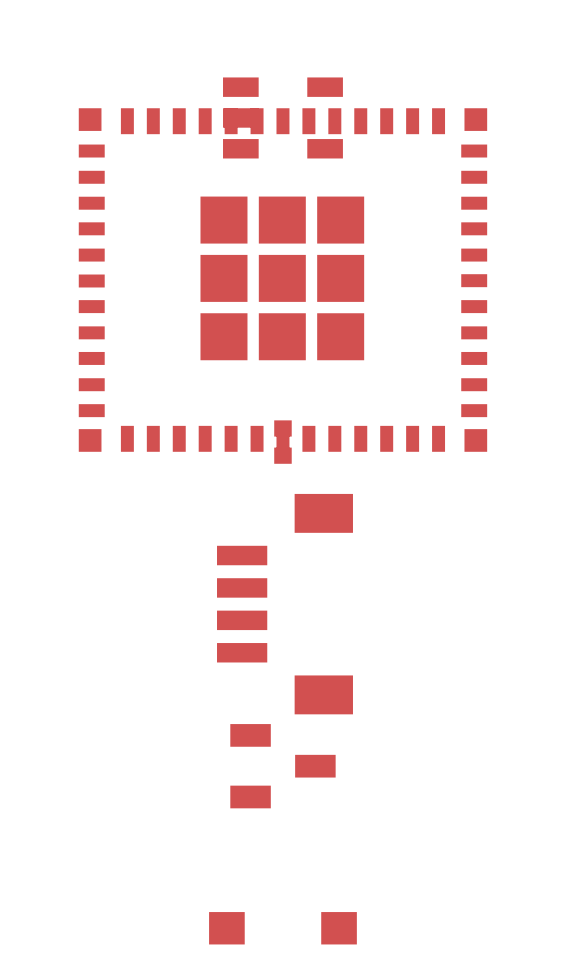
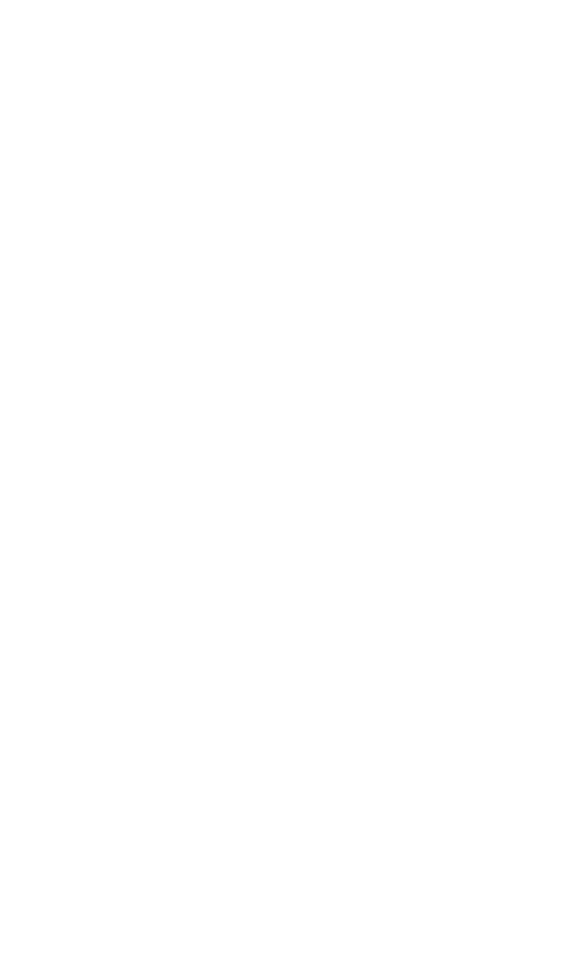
part: (282, 117) -> none
part: (282, 280) -> none
part: (282, 442) -> none
part: (284, 604) -> none
part: (282, 766) -> none
part: (282, 928) -> none

